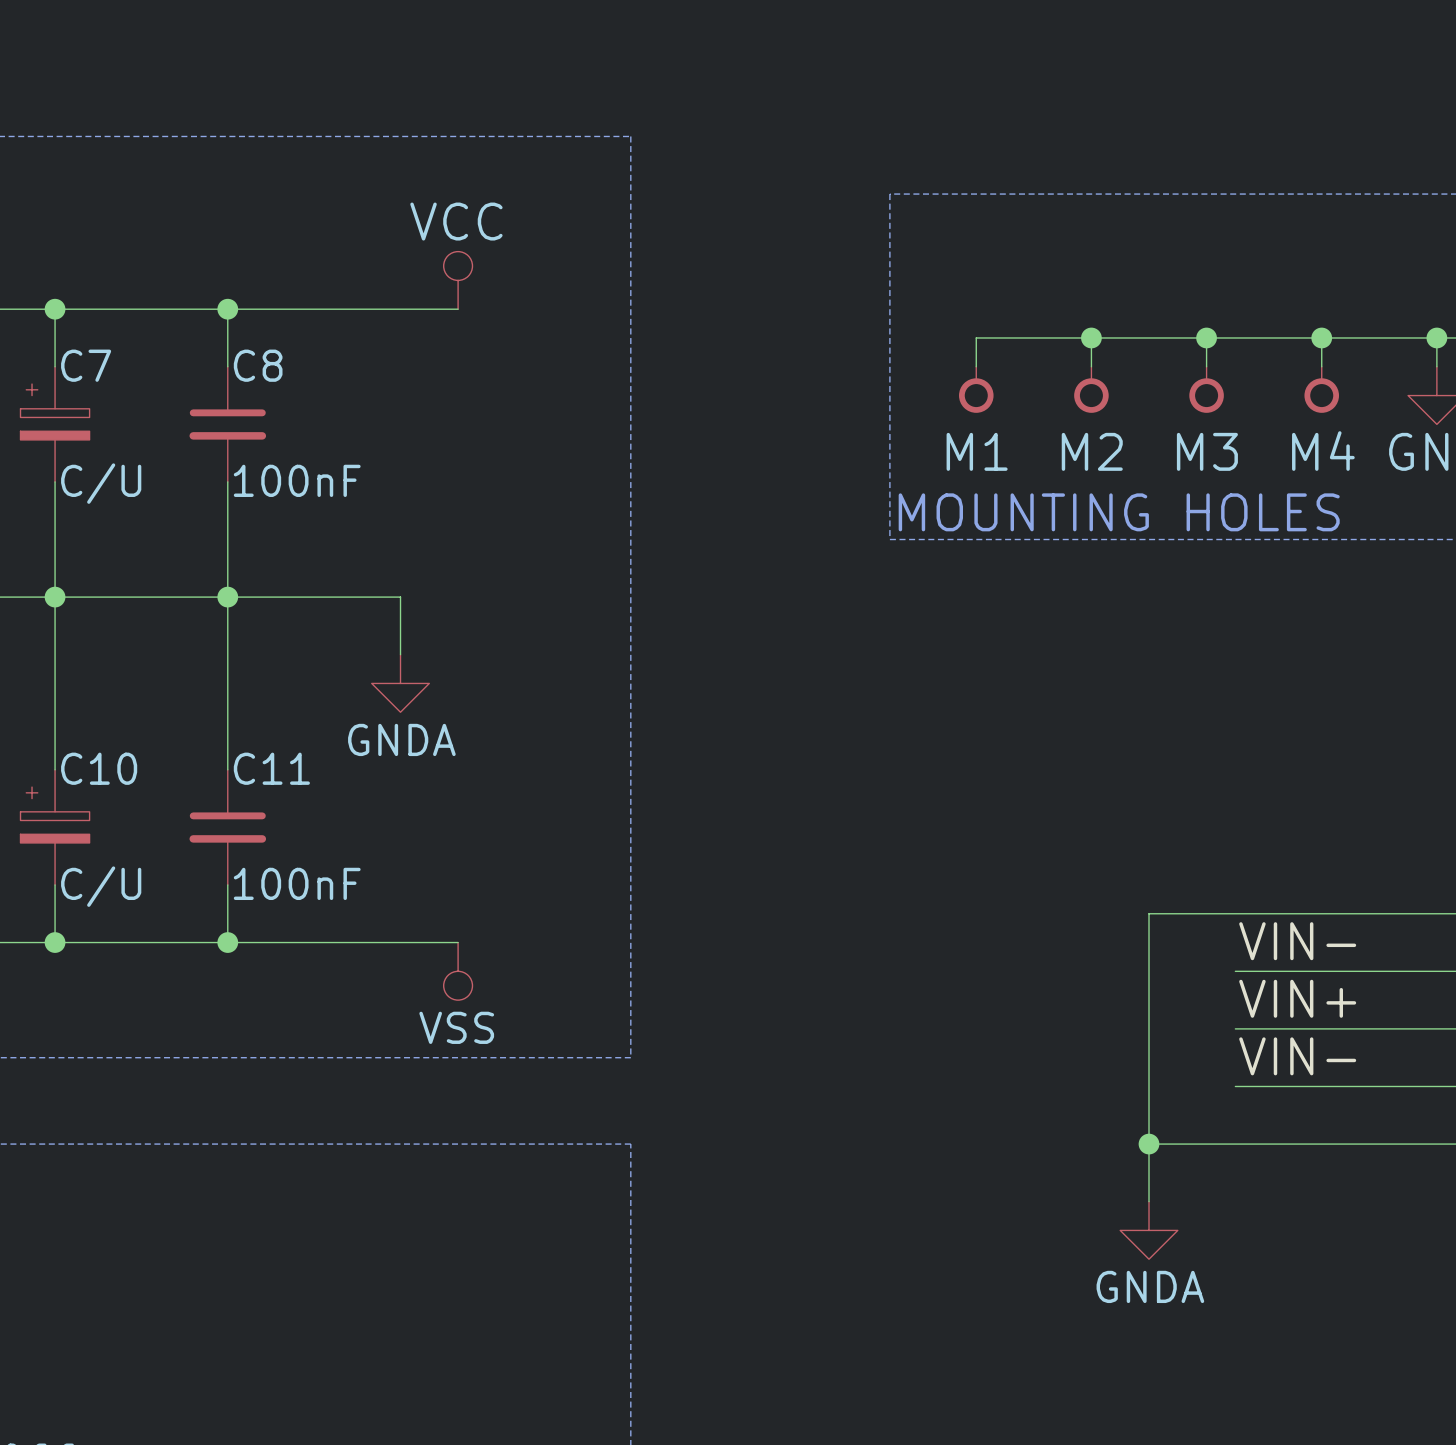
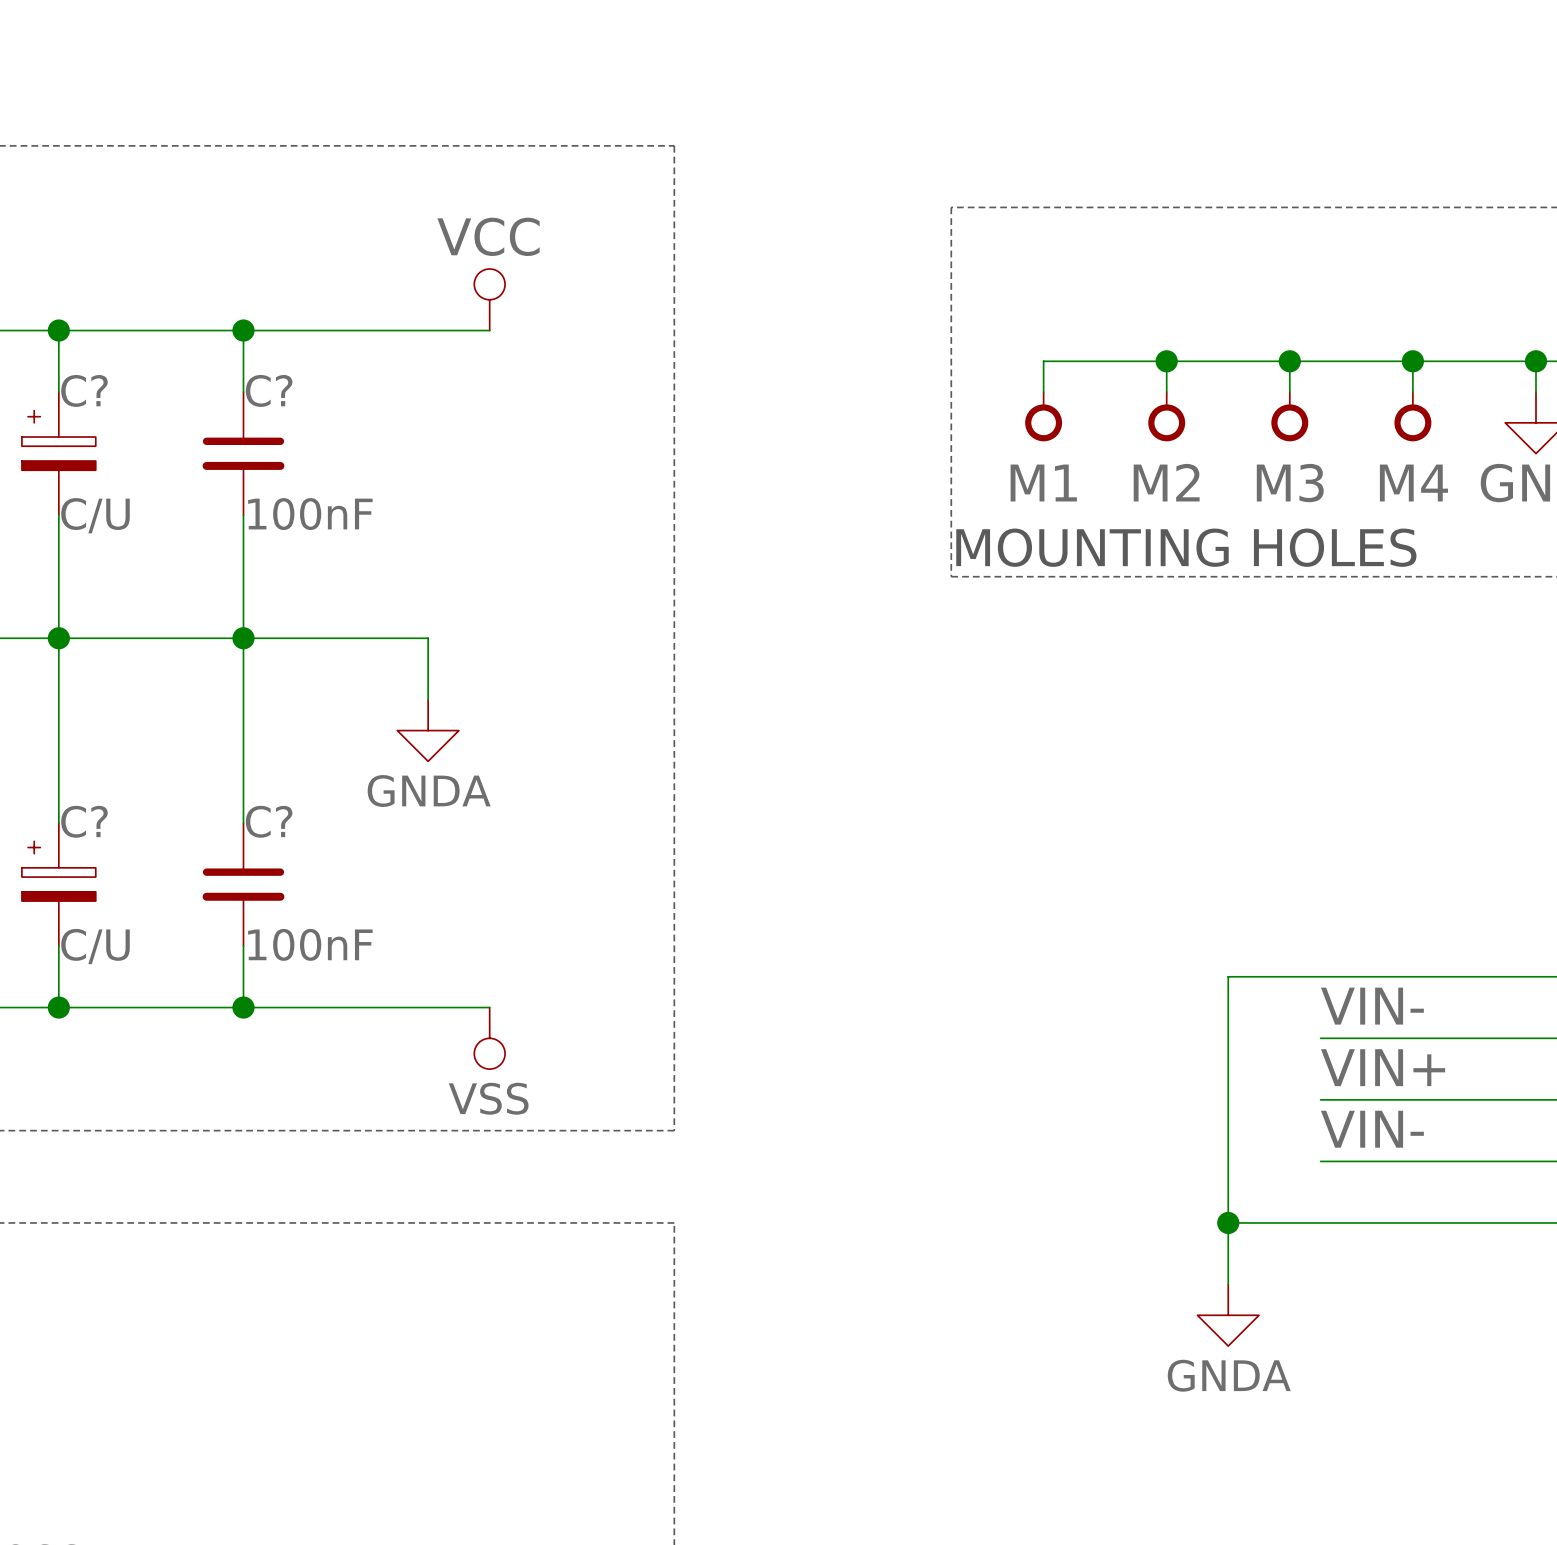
C7 name: C7 (86, 365) -> C? (84, 390)
C8 name: C8 (258, 365) -> C? (269, 390)
C10 name: C10 (99, 768) -> C? (84, 821)
C11 name: C11 (271, 768) -> C? (269, 821)

